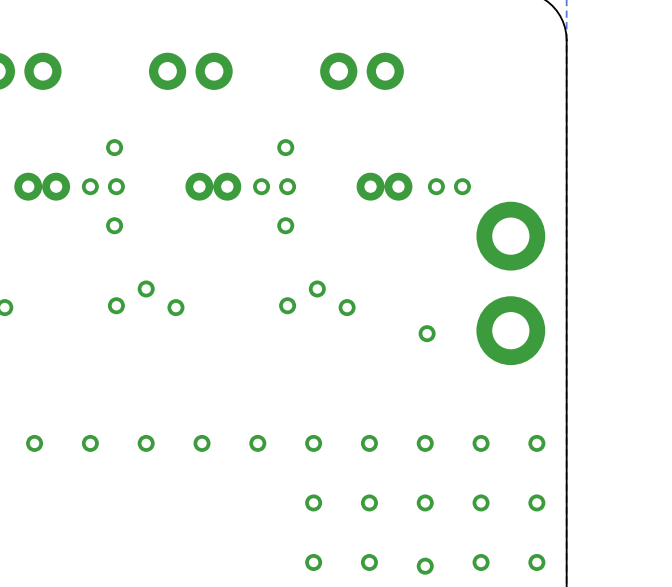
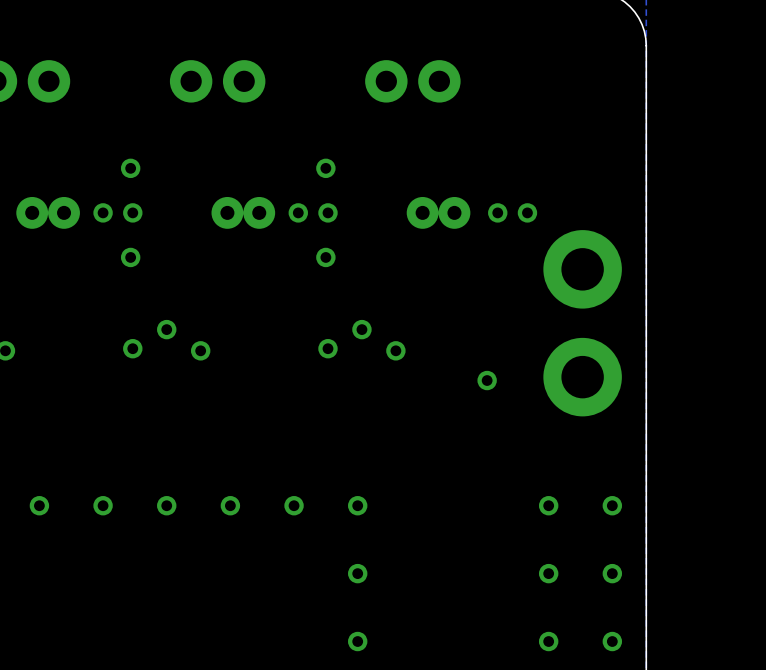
via: (369, 443) -> none
via: (425, 443) -> none
via: (369, 502) -> none
via: (425, 502) -> none
via: (369, 562) -> none
via: (425, 566) -> none

